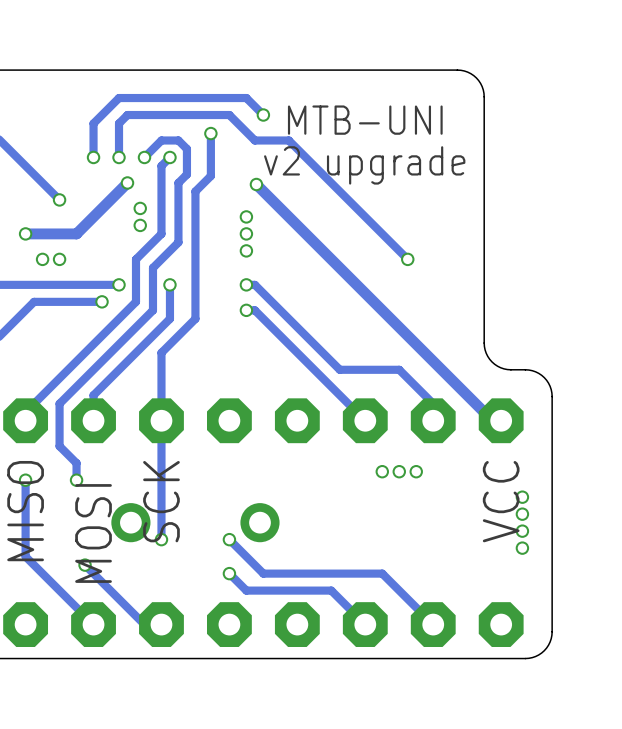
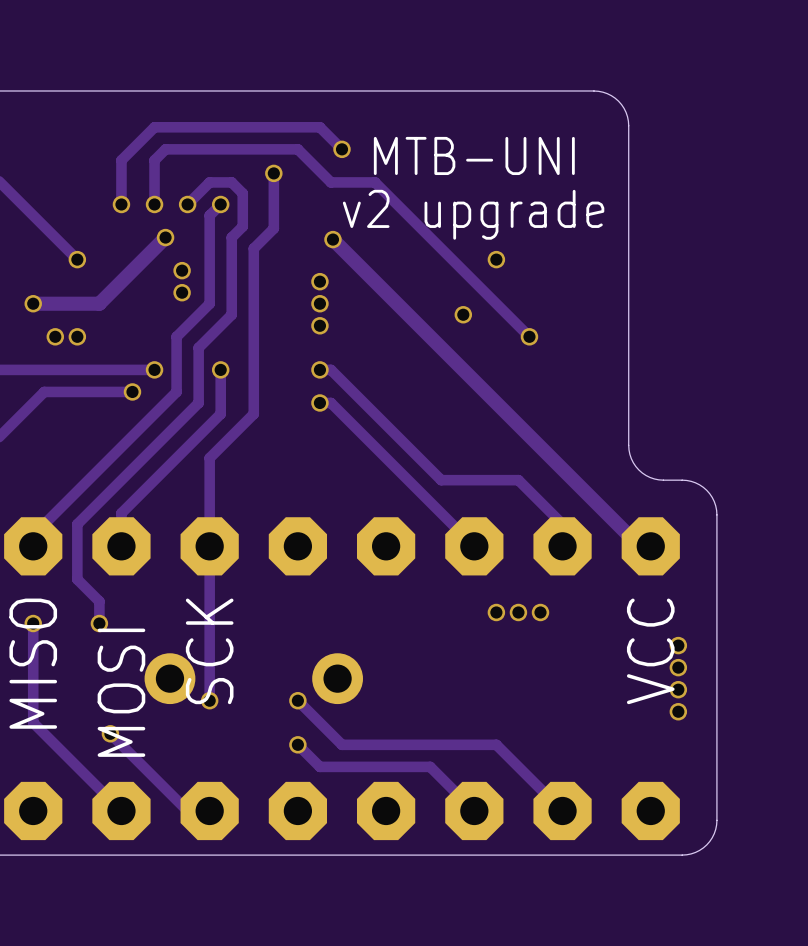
via: none -> (496, 259)
via: none -> (463, 314)

